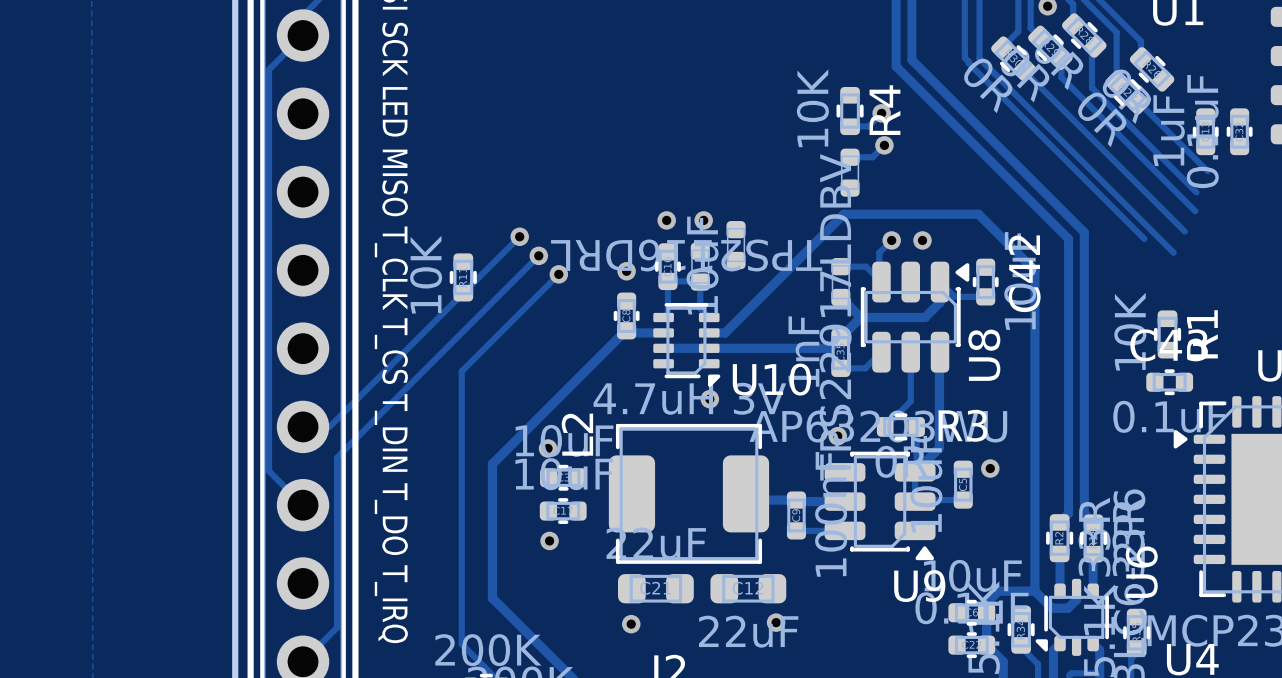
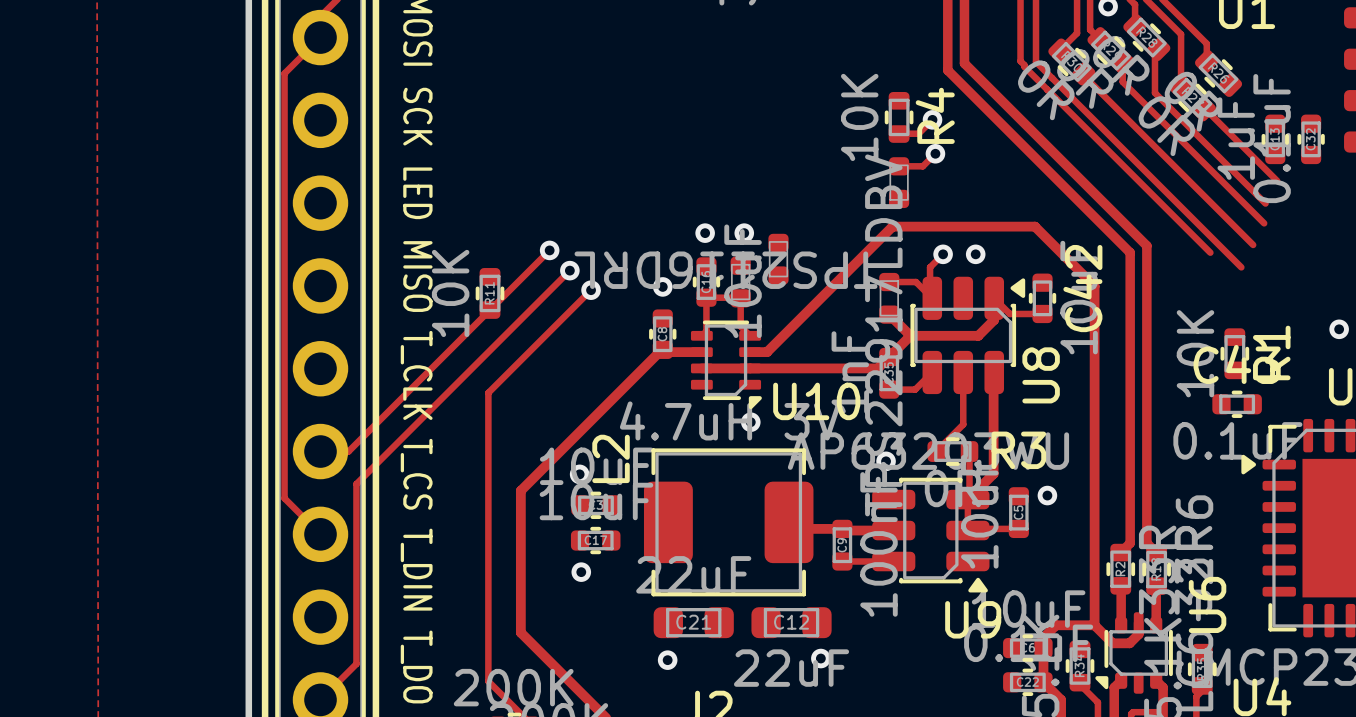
via: none -> (1339, 329)

